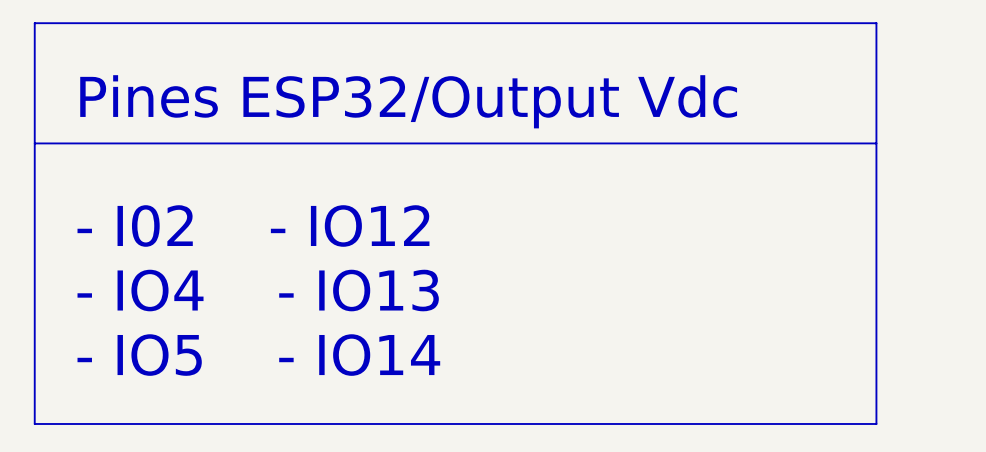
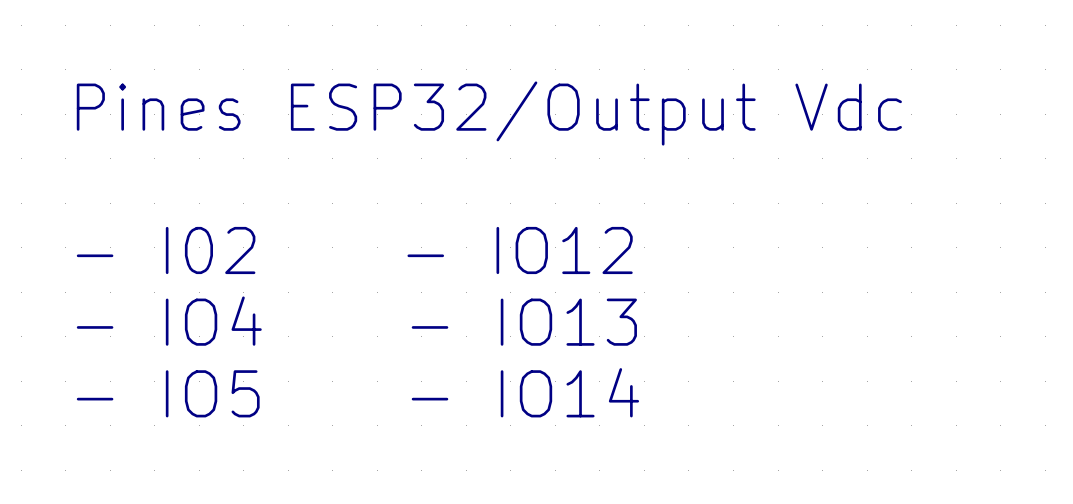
line: (34, 23) (34, 423) (876, 423) (876, 23) (34, 23) -> none
line: (34, 143) (876, 143) -> none

